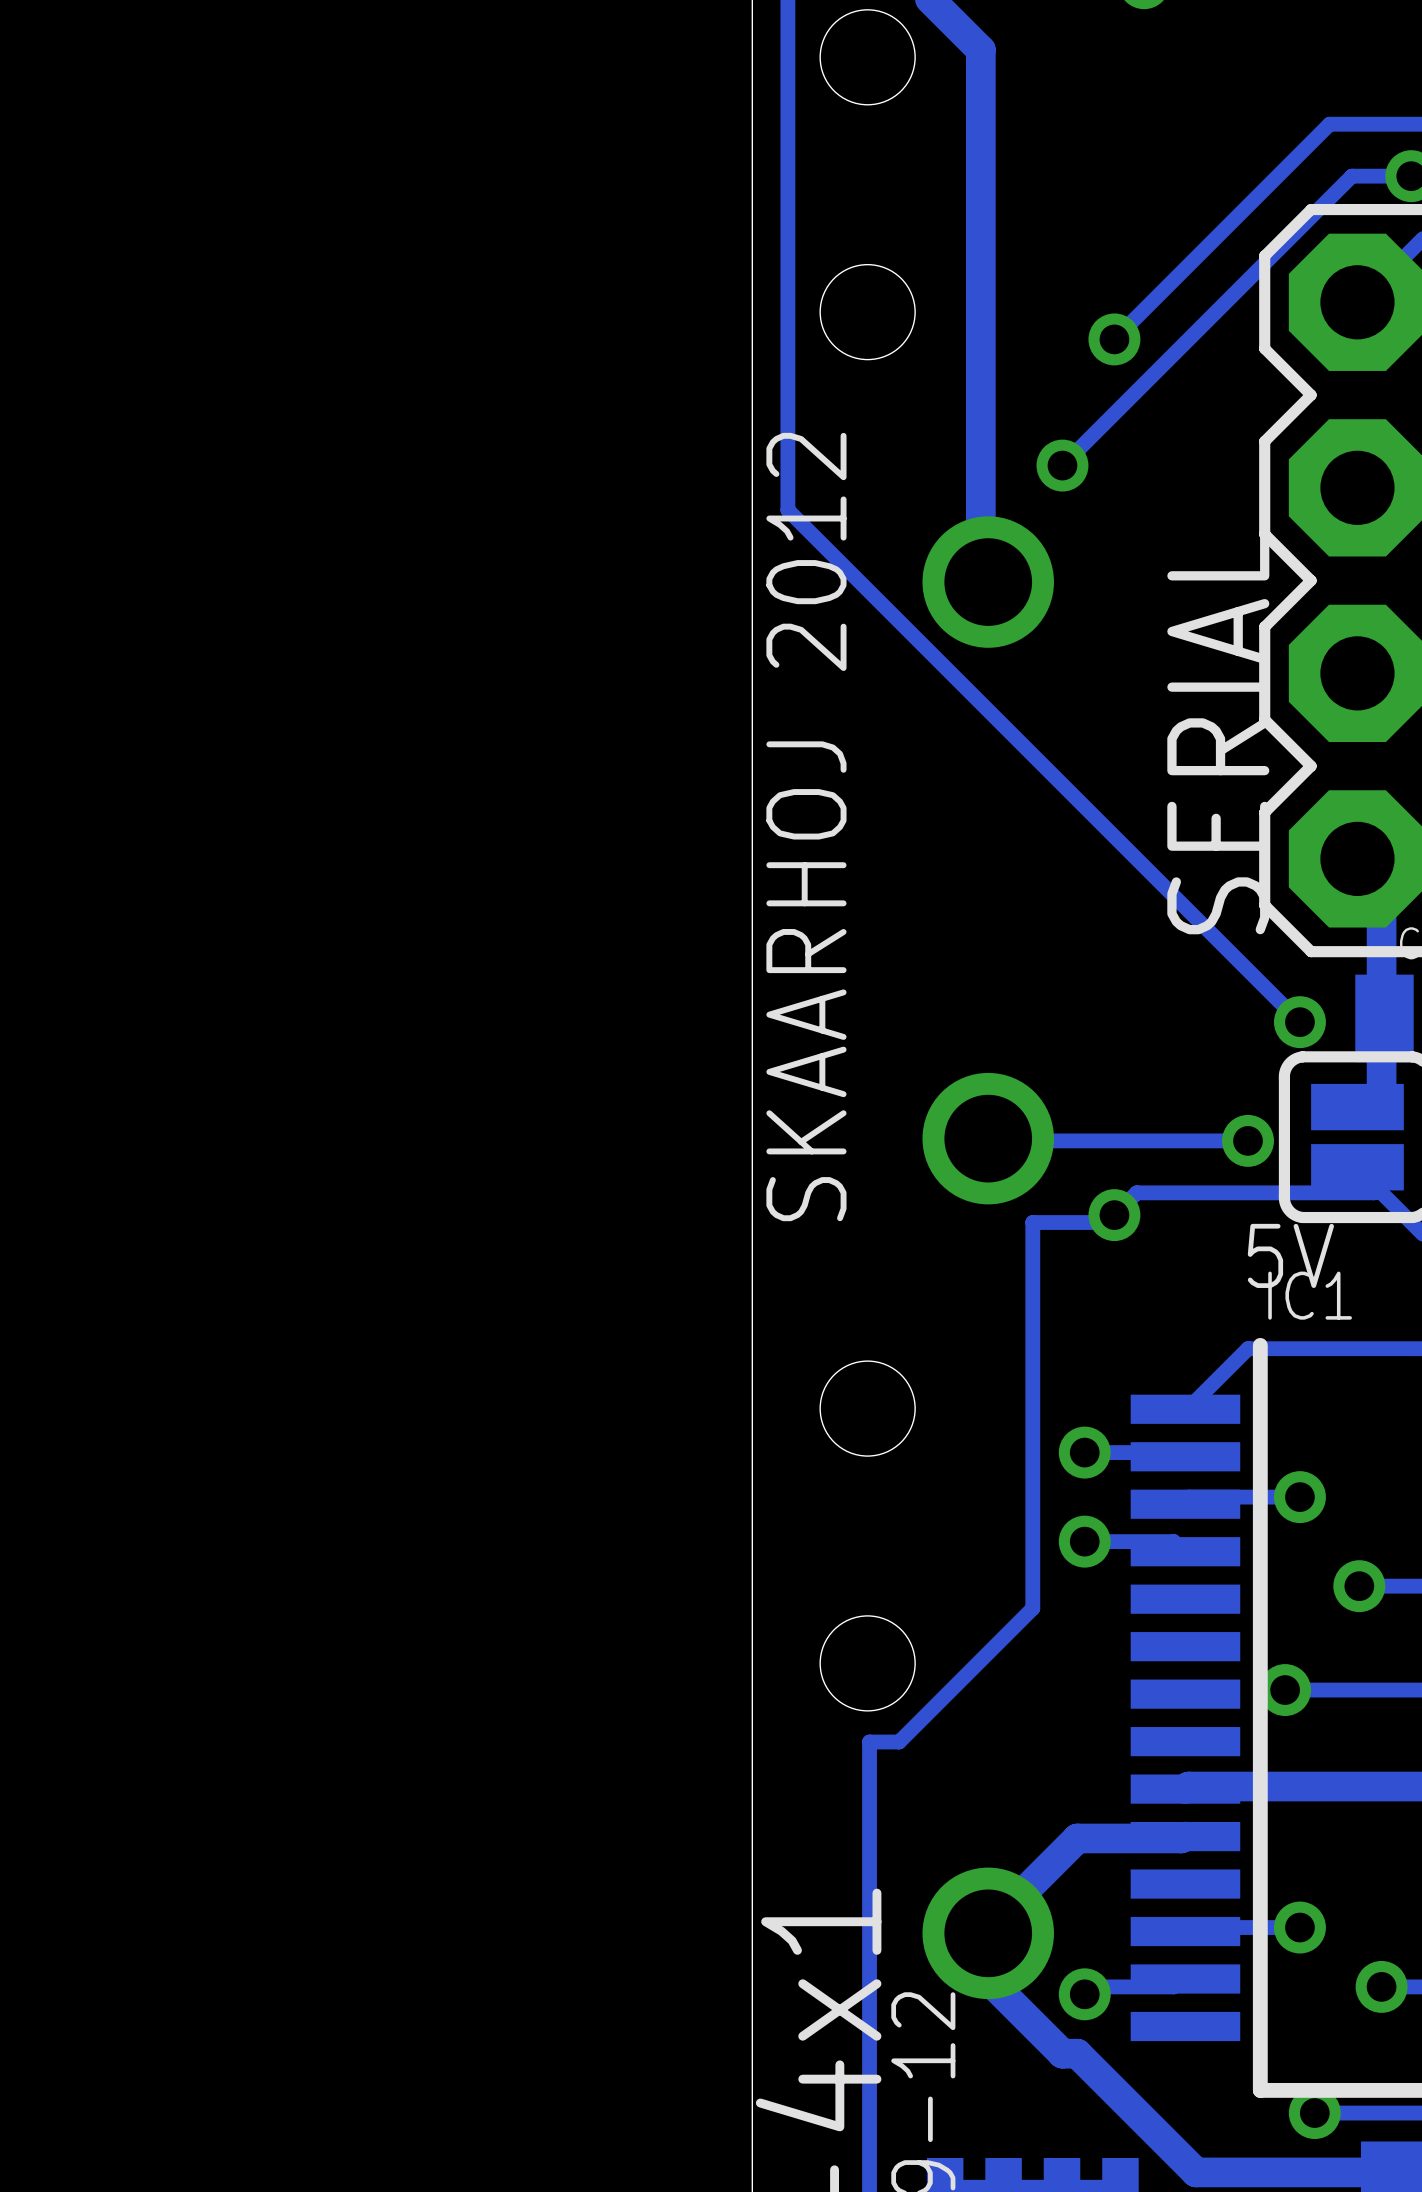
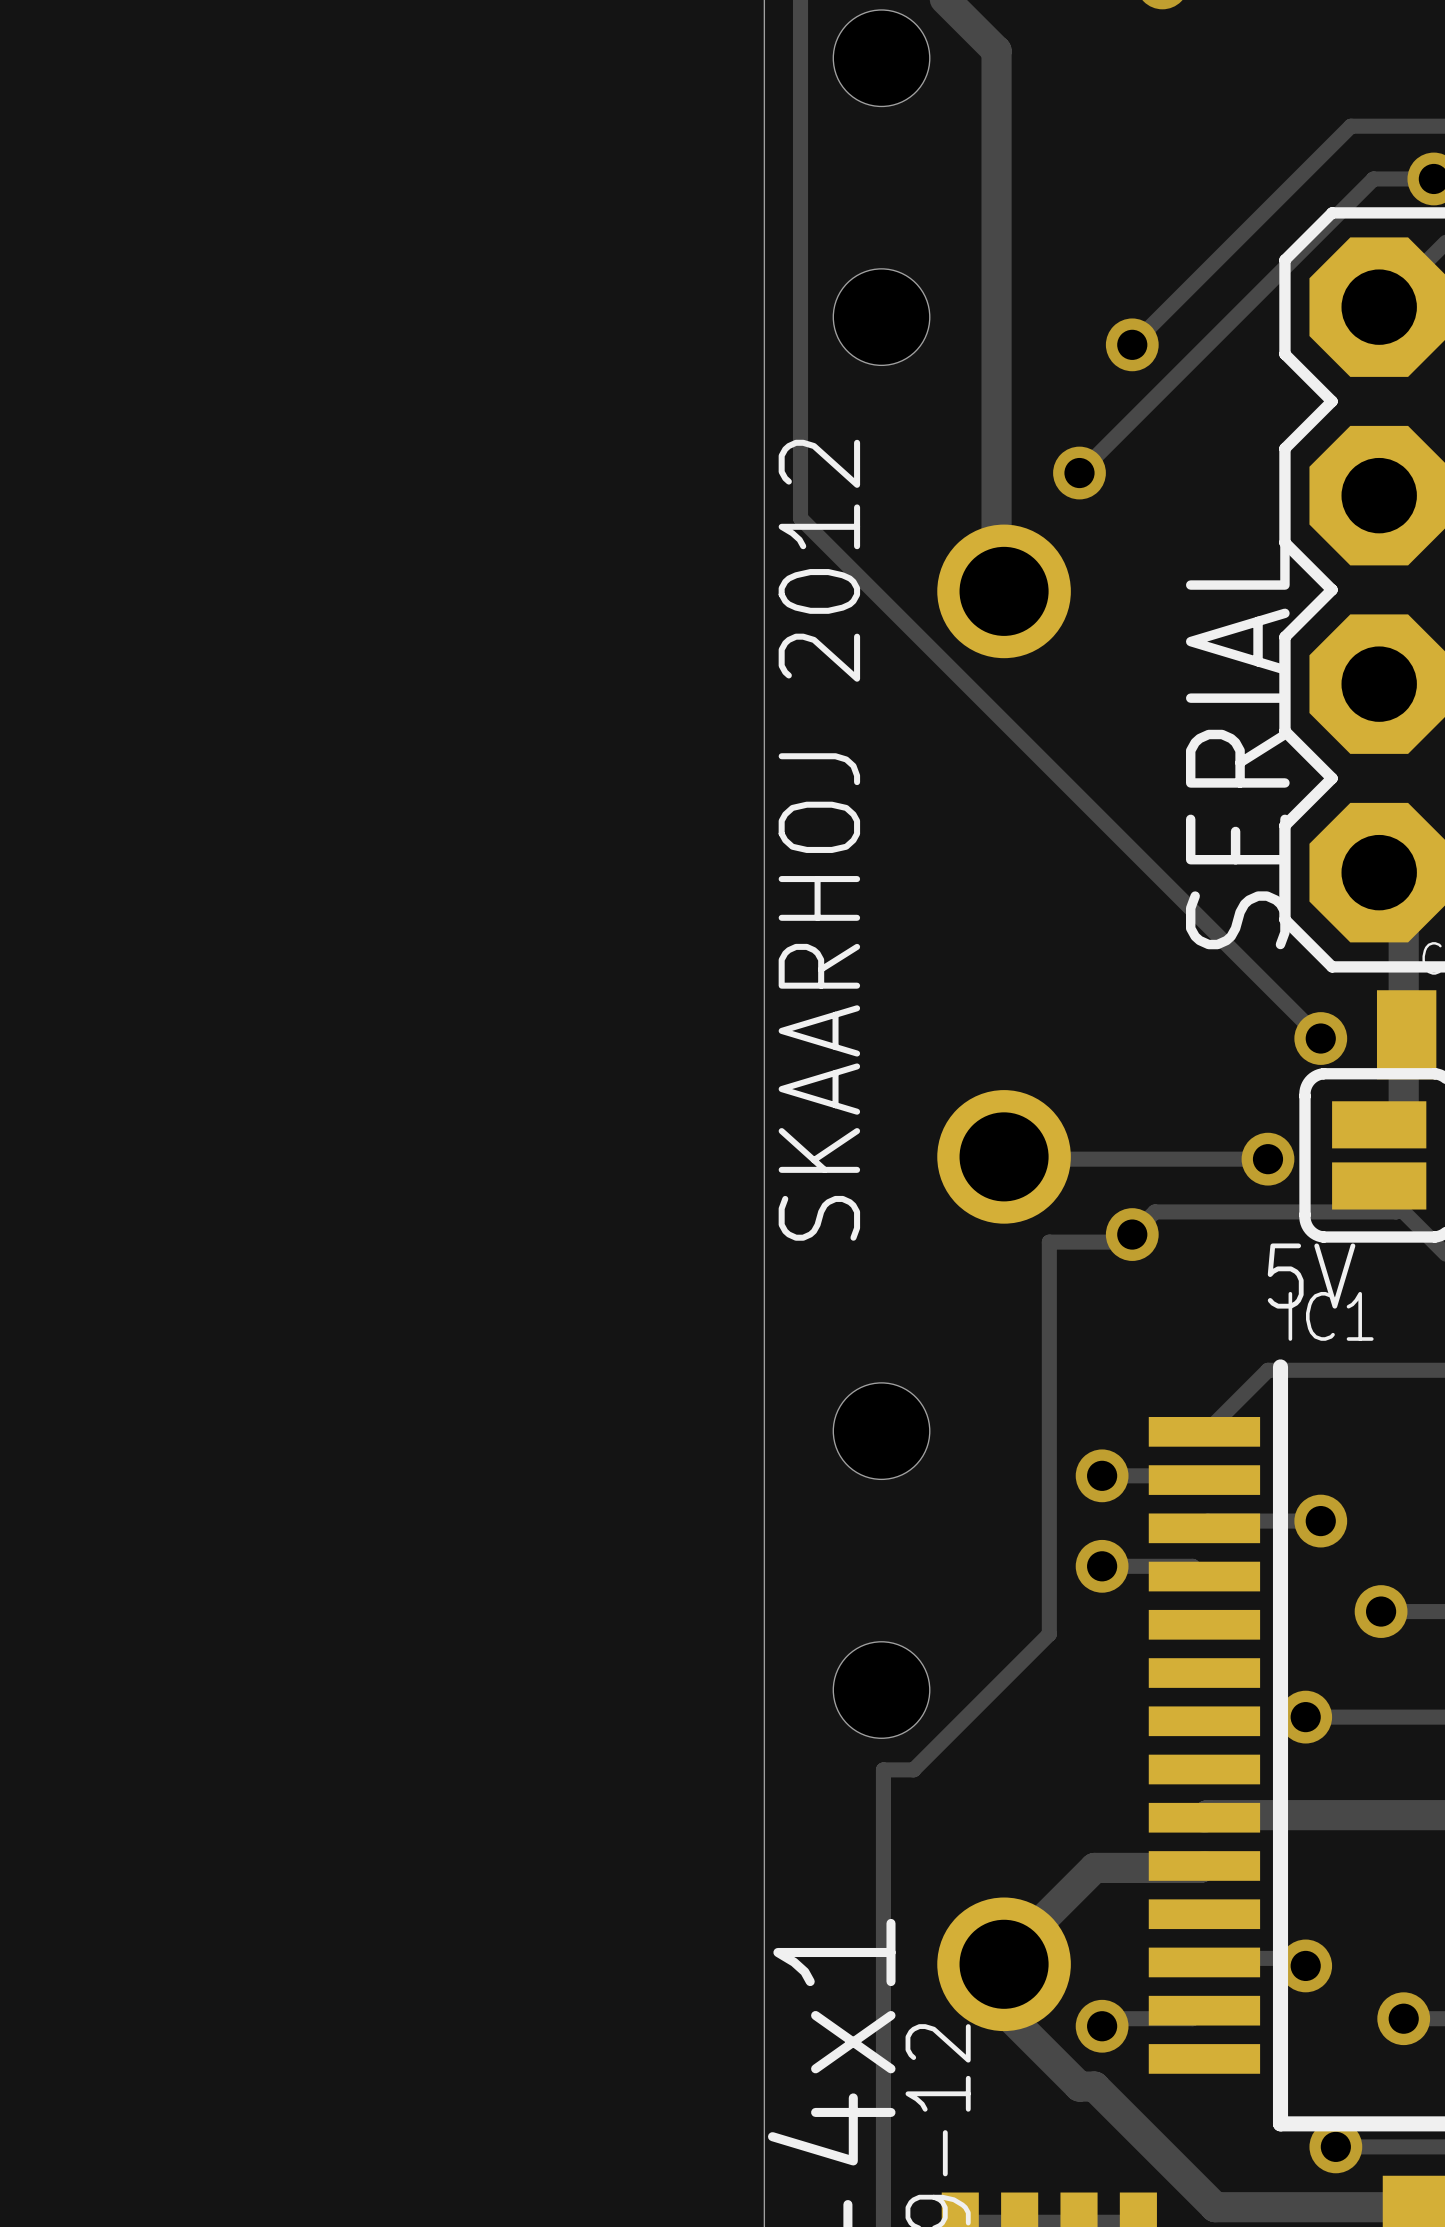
via position: (1299, 1927) -> (1305, 1965)

